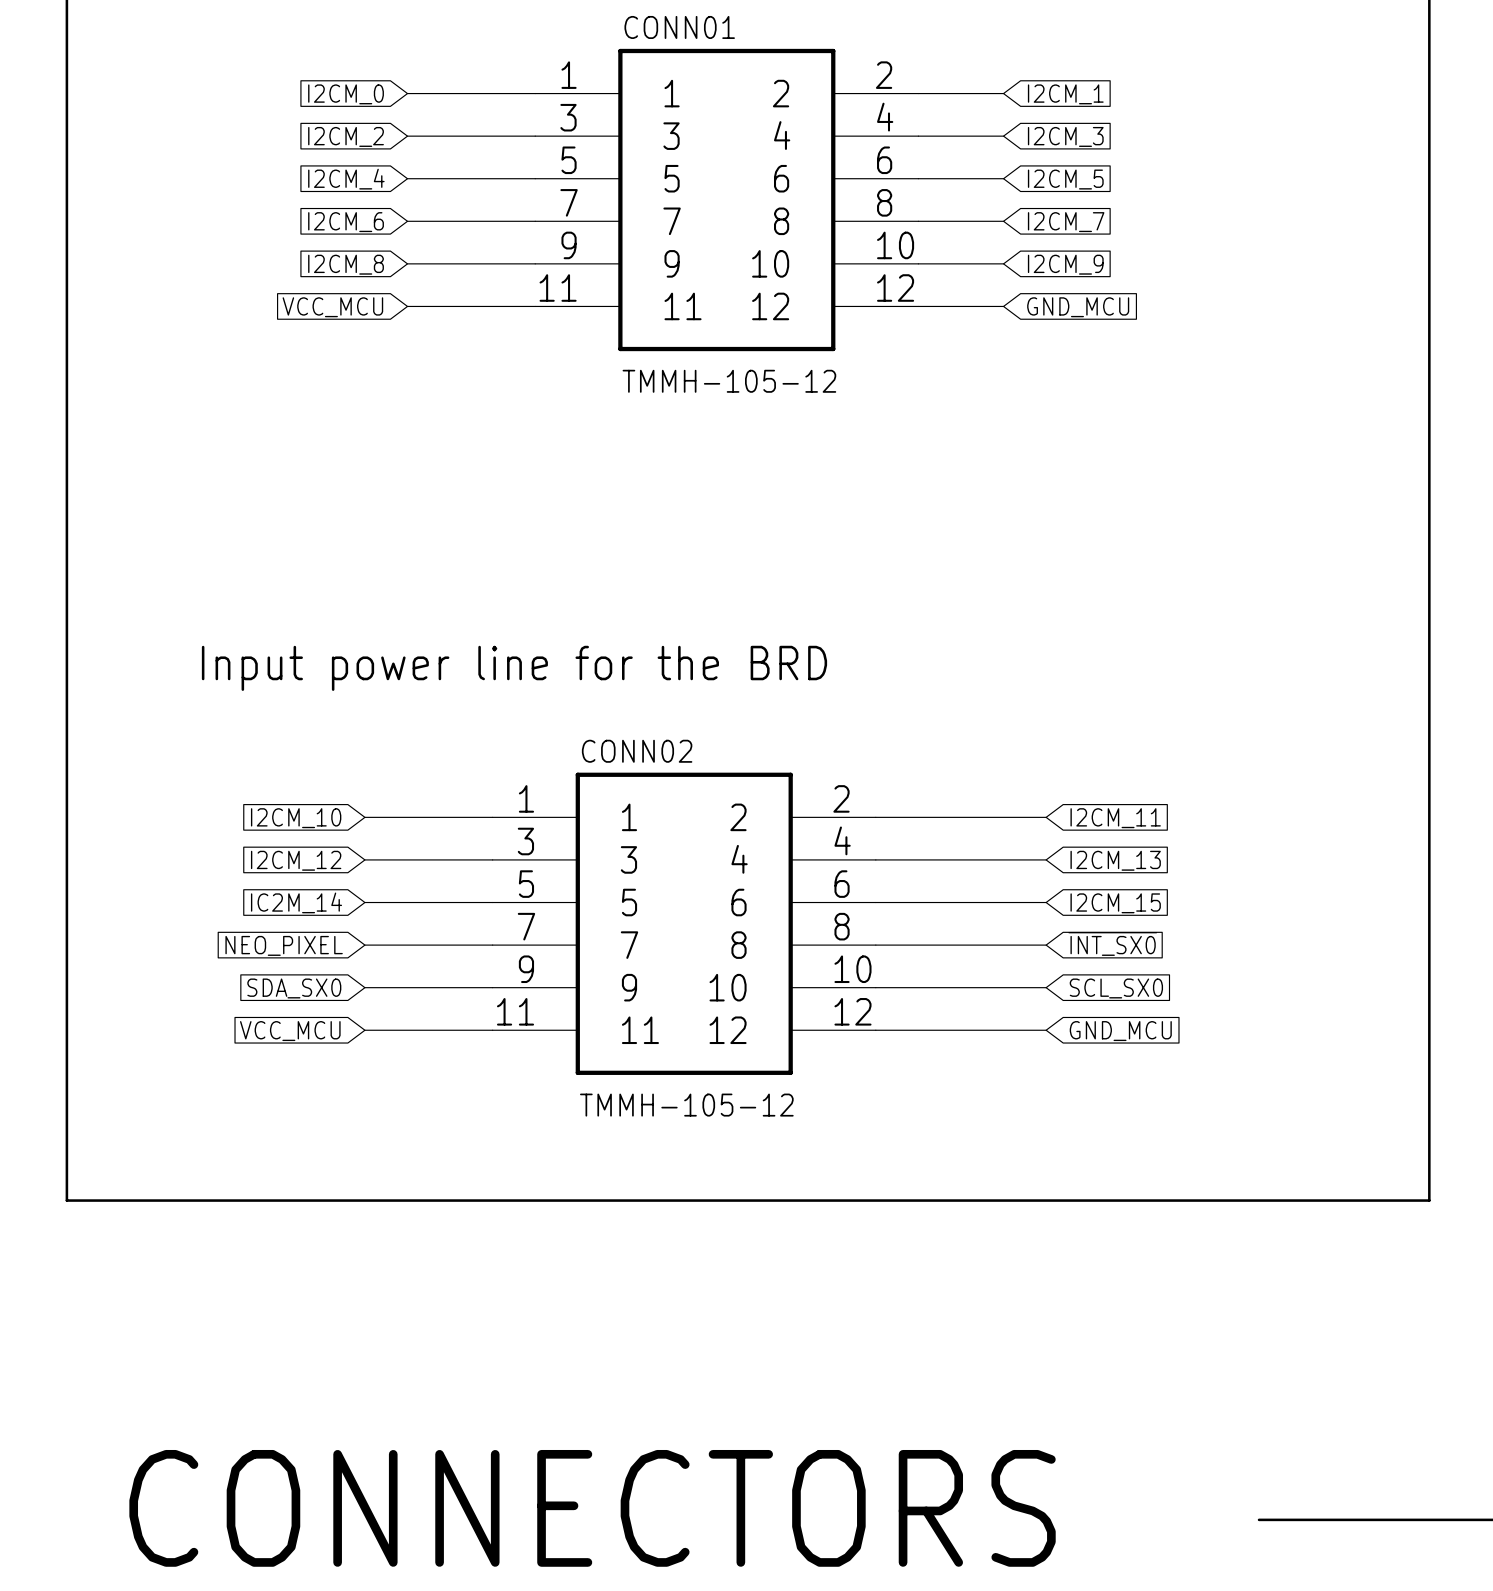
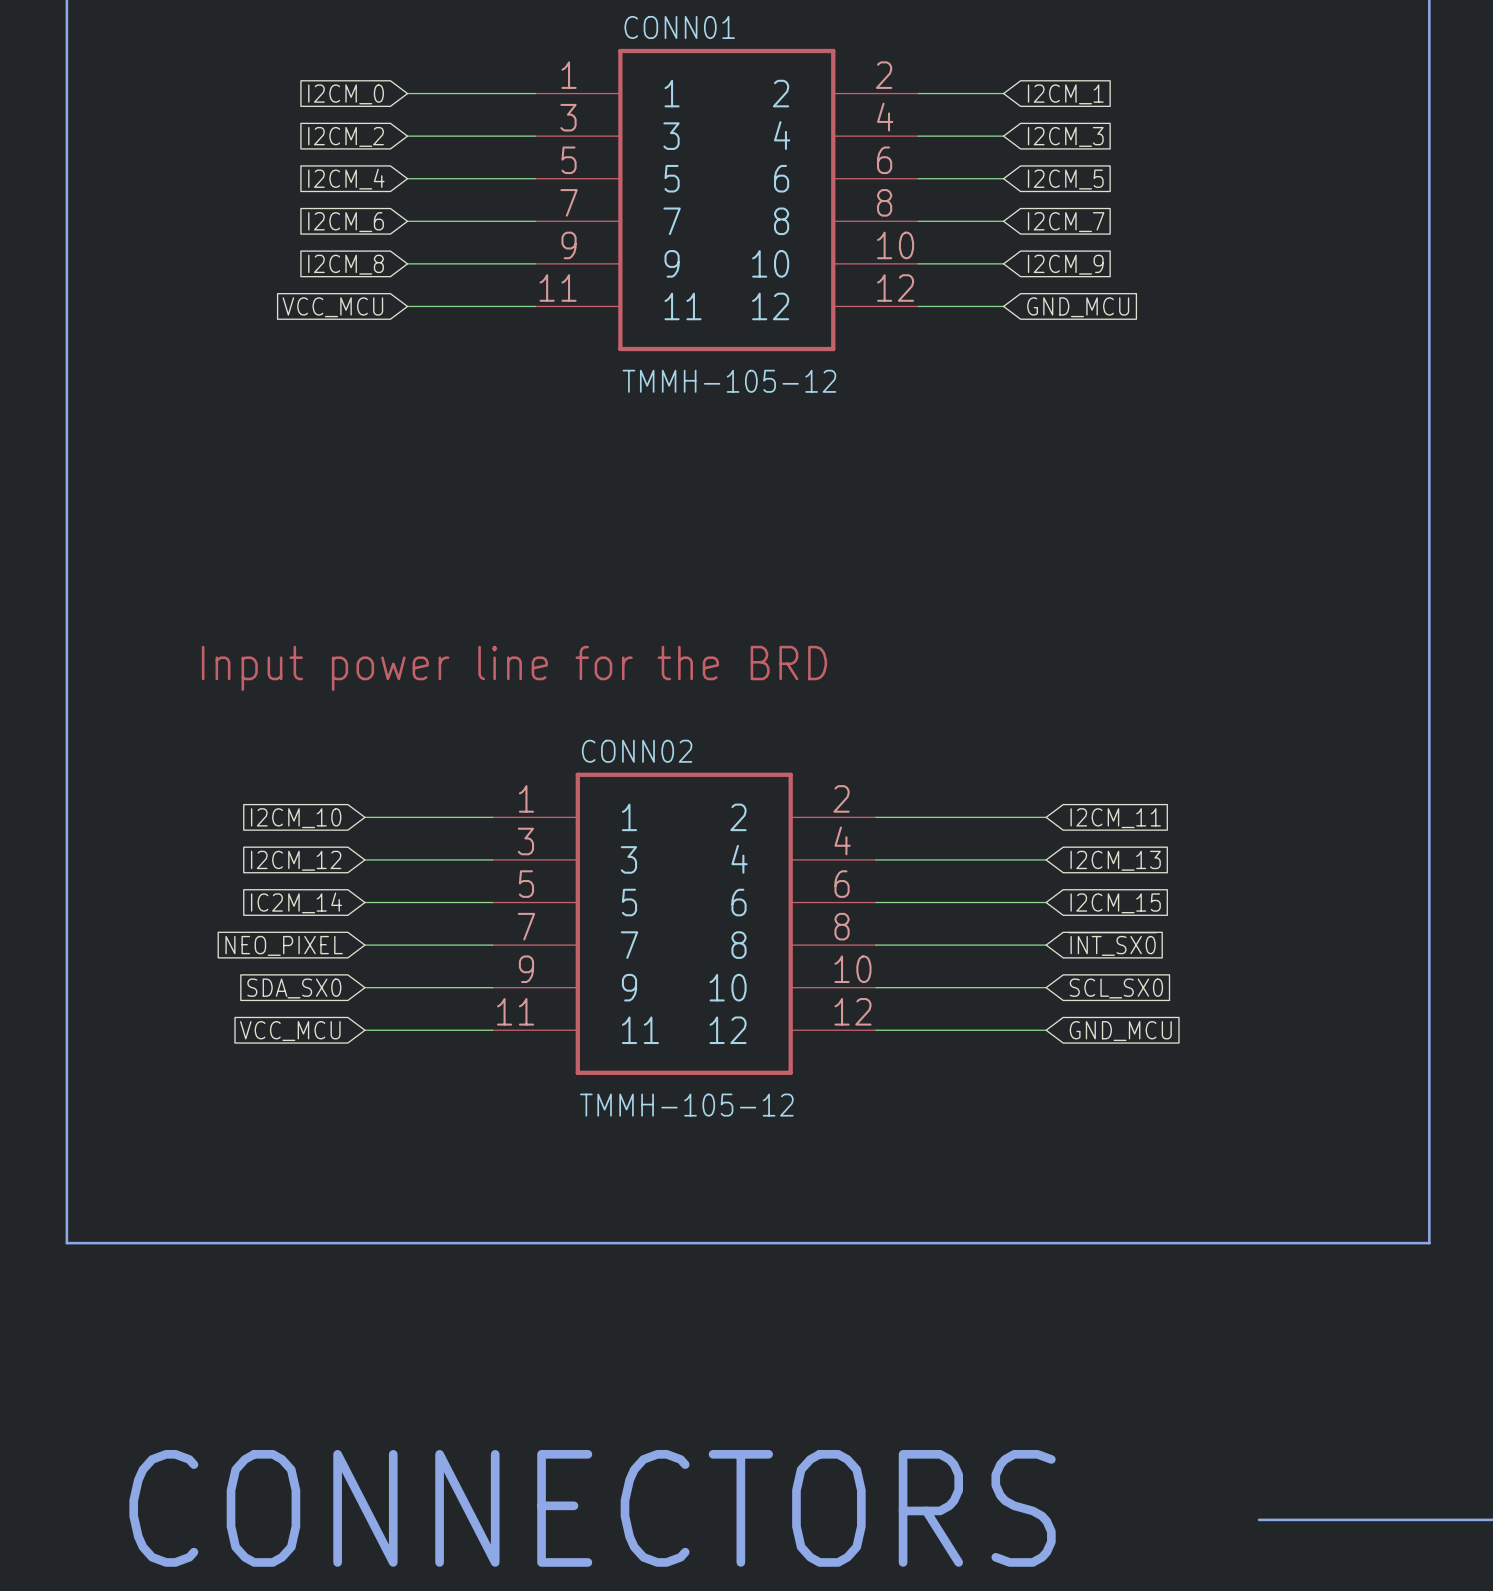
line: (66, 1200) (1429, 1200) -> (66, 1200) (66, 1243) (1429, 1243) (1429, 1200)

